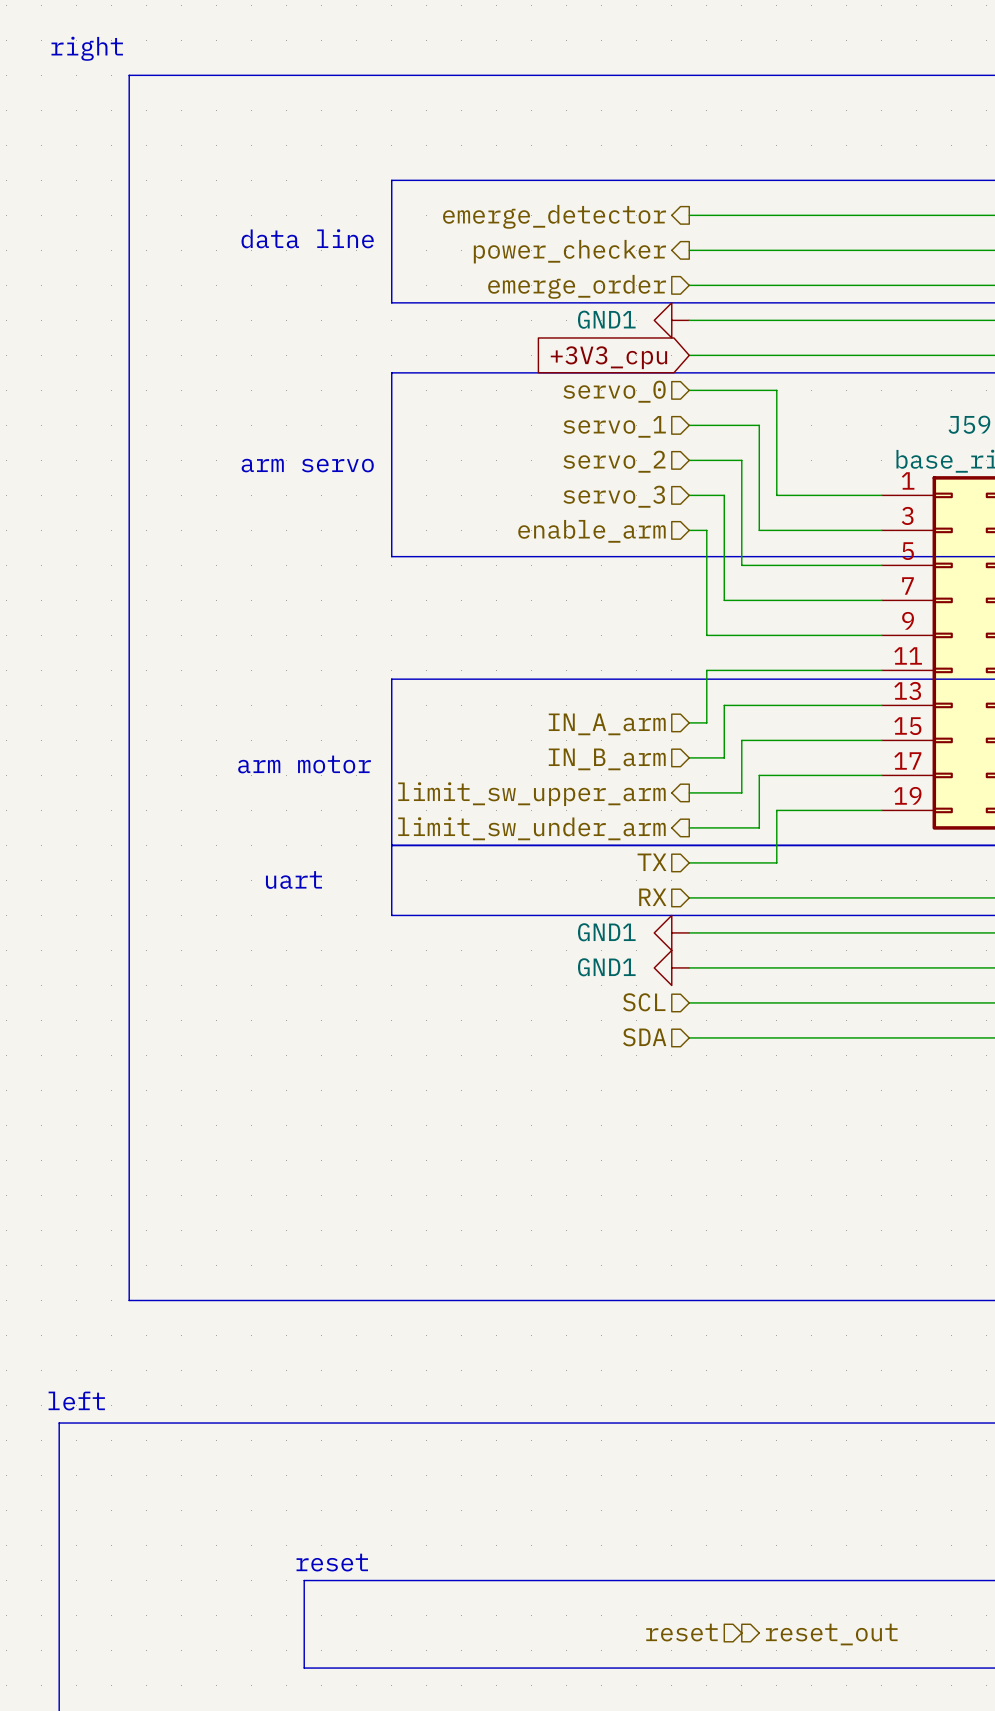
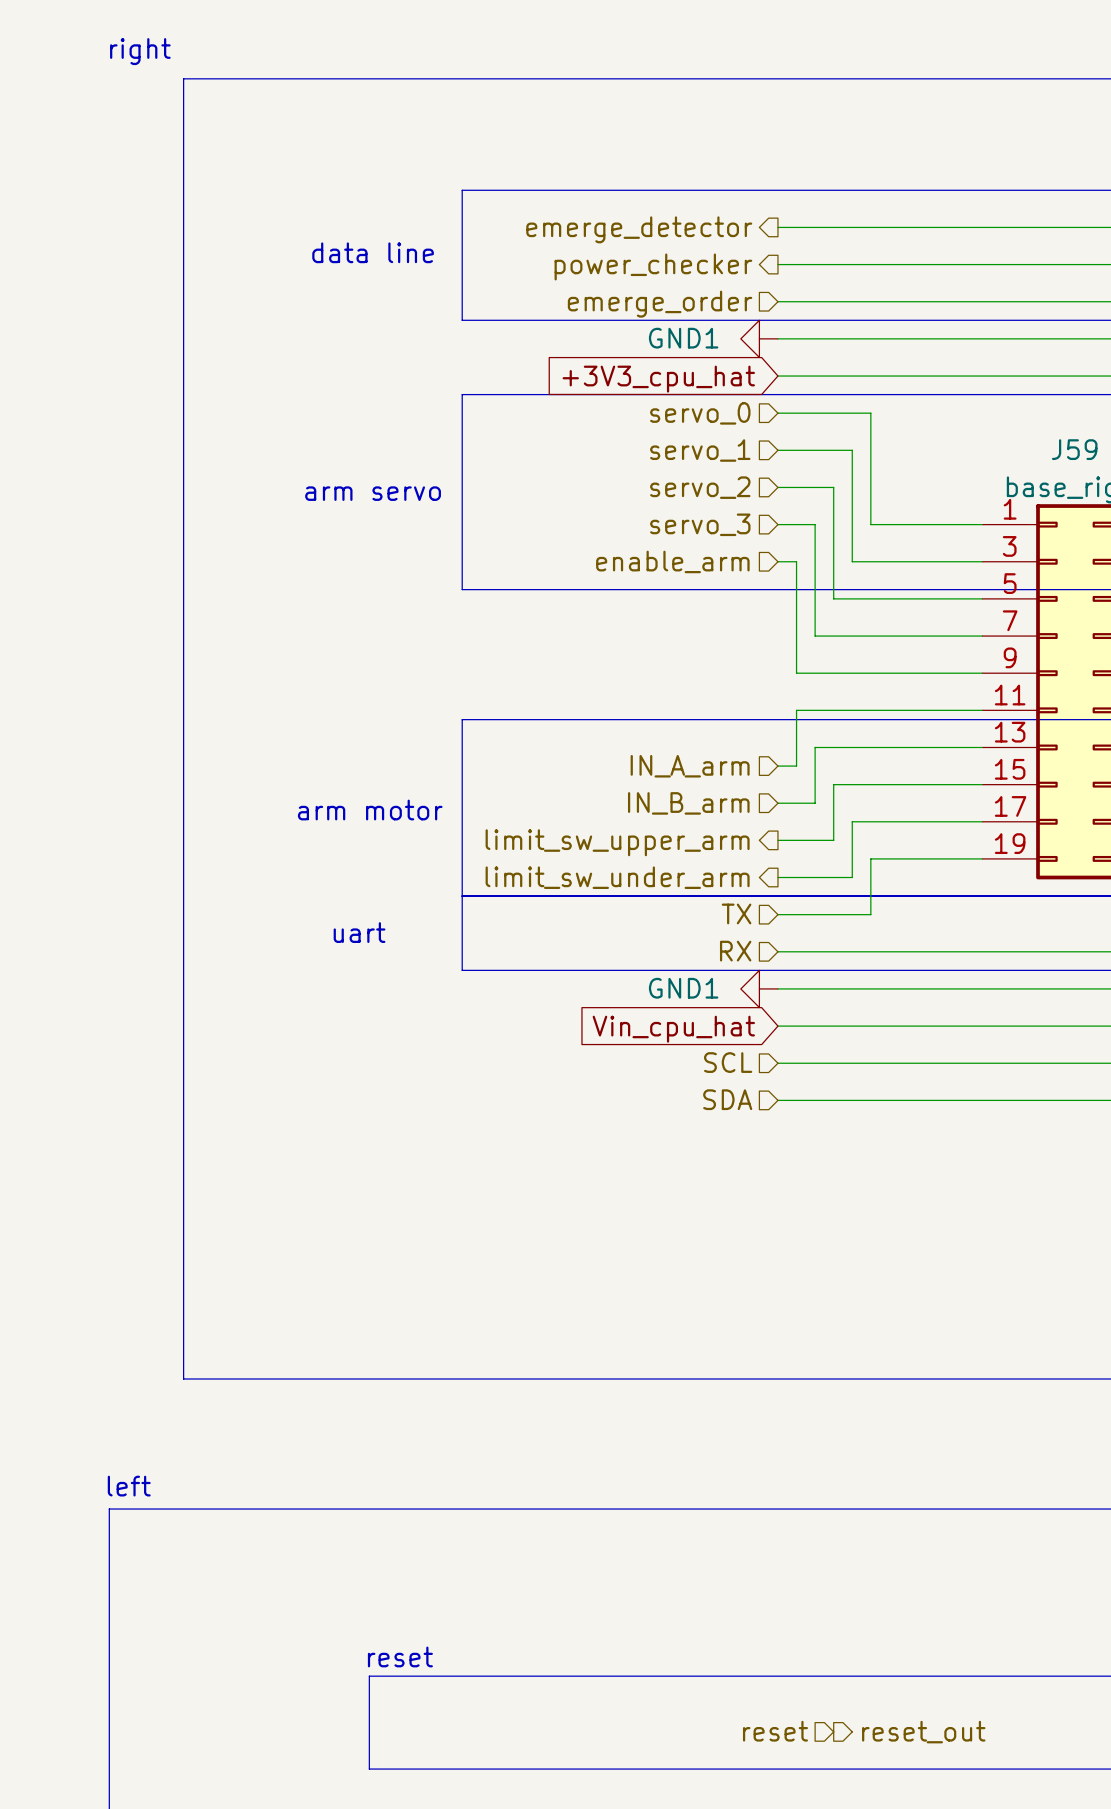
global label: +3V3_cpu (608, 357) -> +3V3_cpu_hat (658, 379)
power symbol: GND1 (671, 967) -> none
global label: none -> Vin_cpu_hat (673, 1029)

